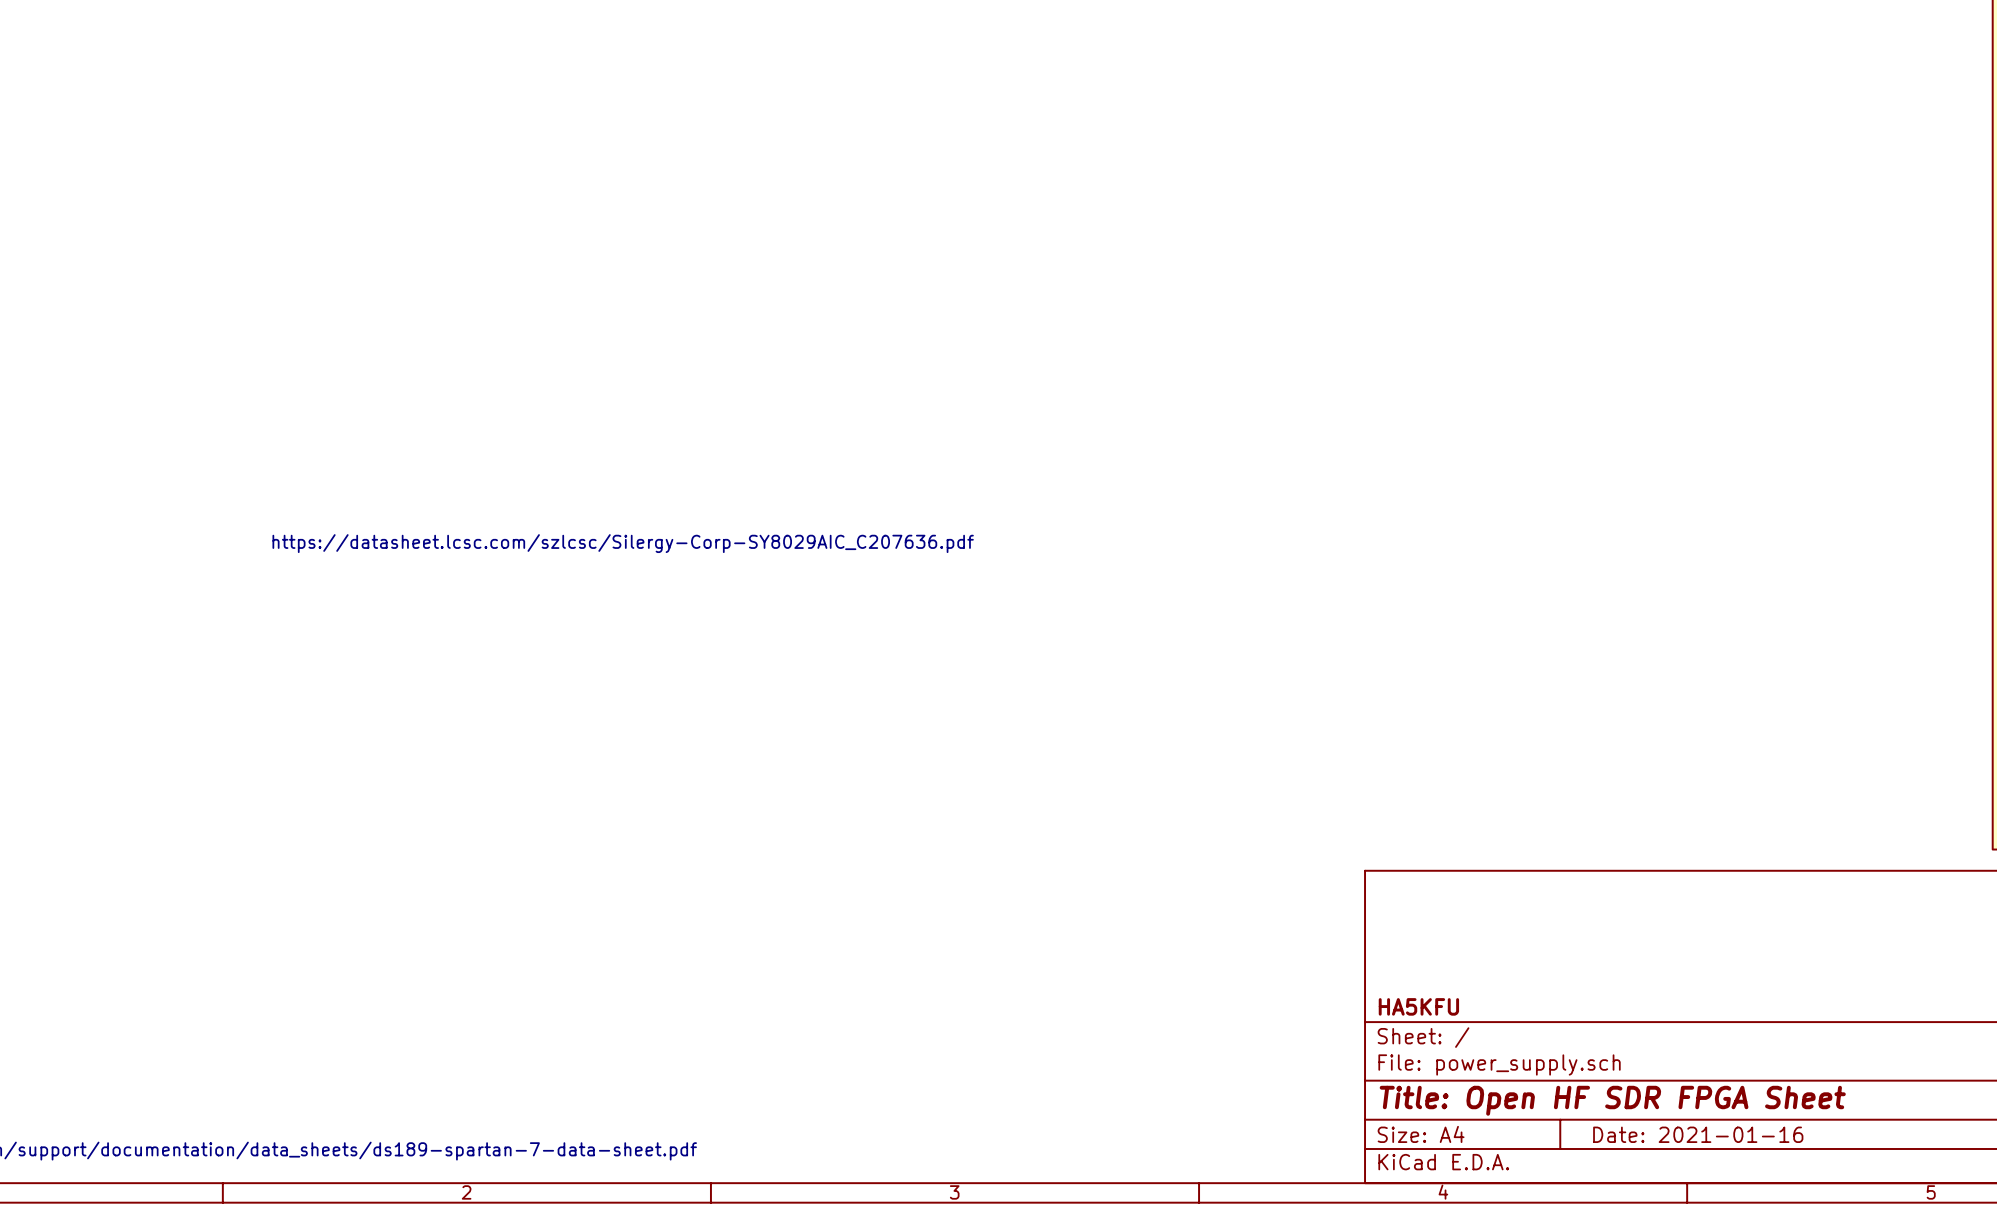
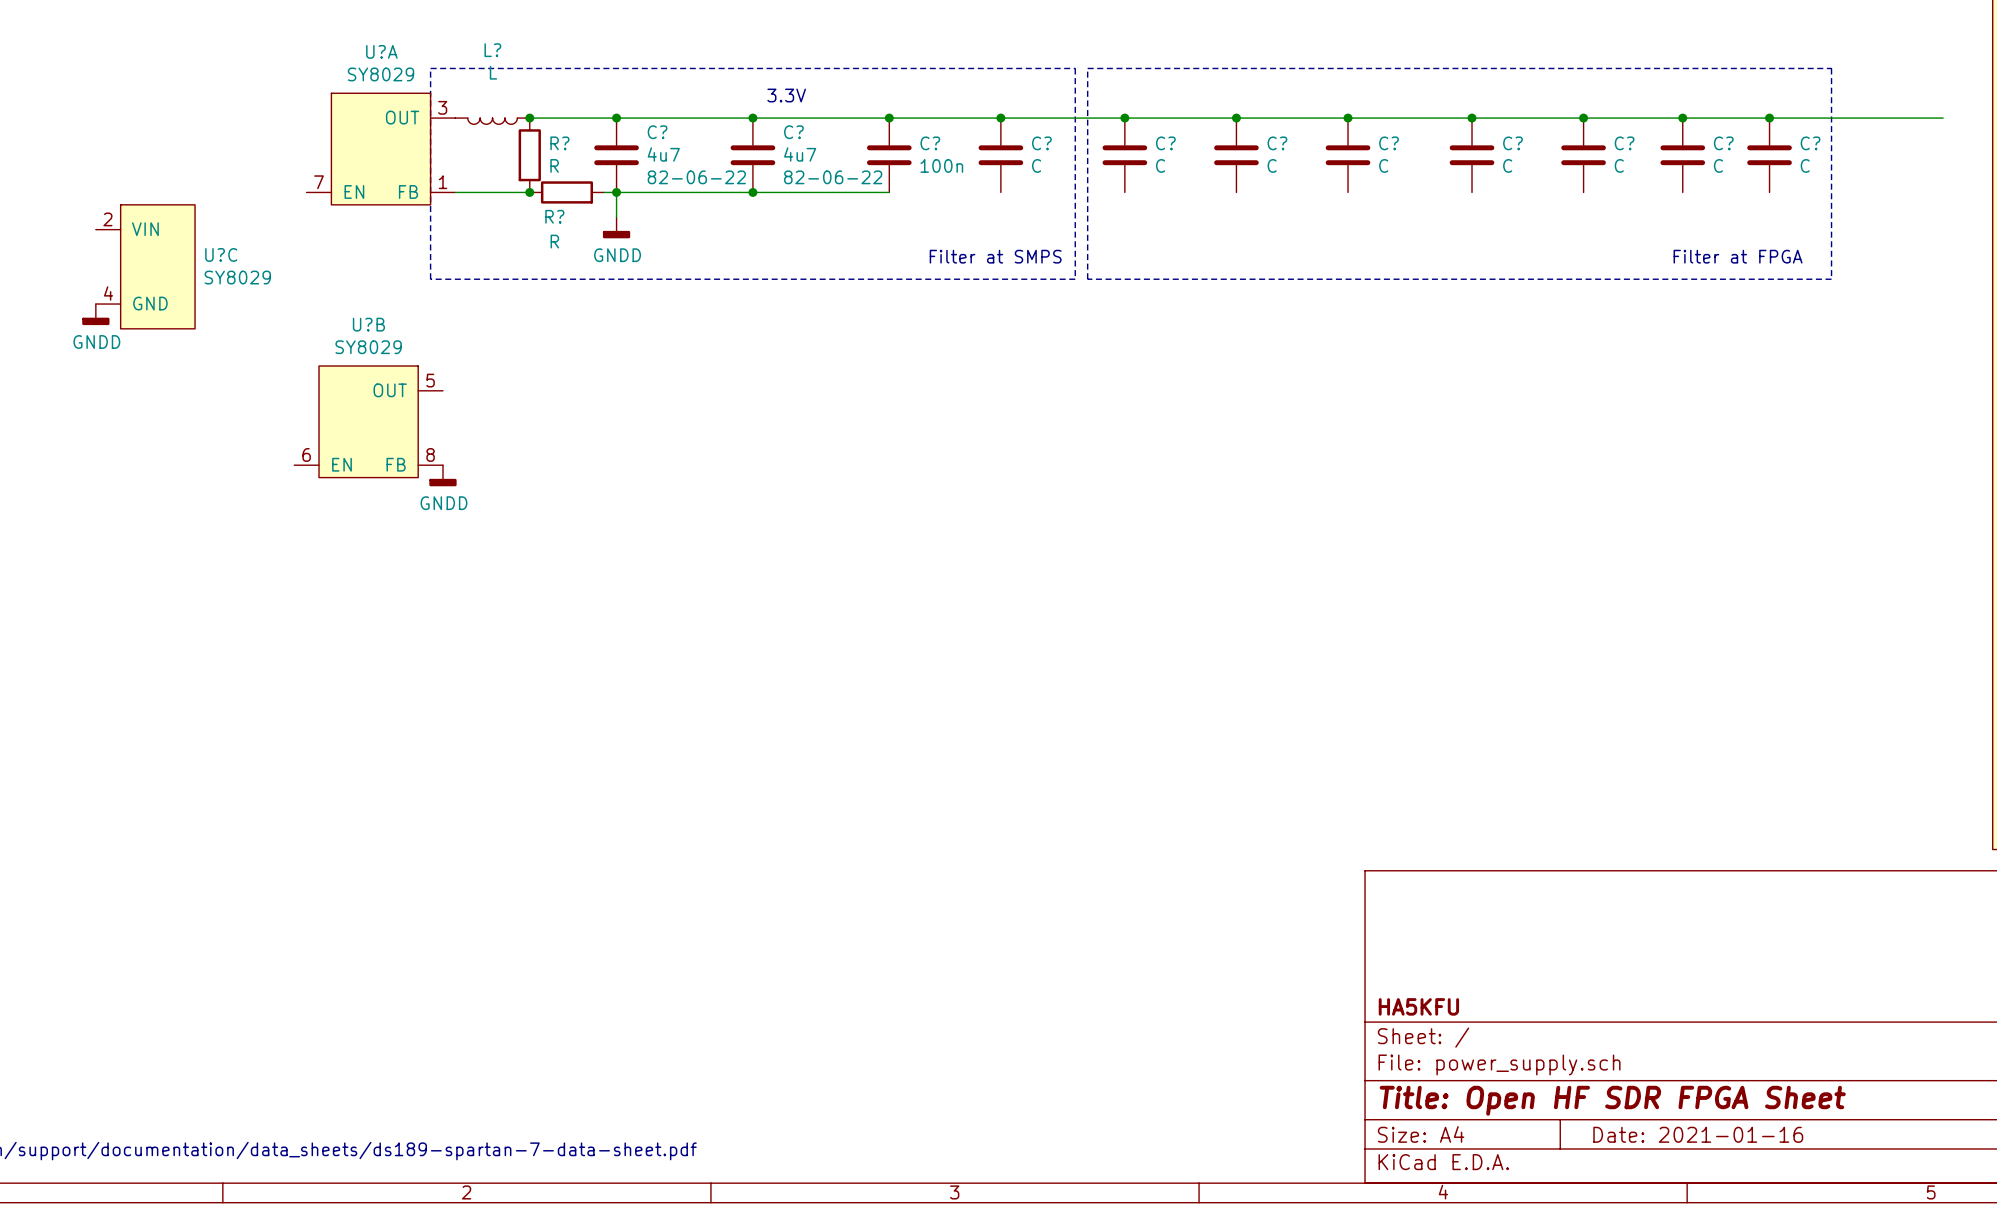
line: none -> (430, 68) (430, 279) (1075, 279) (1075, 68) (430, 68)
line: none -> (1087, 68) (1831, 68) (1831, 279) (1087, 279) (1087, 68)
text: none -> 3.3V (786, 95)
wire: none -> (529, 118) (1943, 118)
junction: none -> (529, 118)
junction: none -> (616, 118)
junction: none -> (752, 118)
junction: none -> (889, 118)
junction: none -> (1000, 118)
junction: none -> (1124, 118)
junction: none -> (1236, 118)
junction: none -> (1348, 118)
junction: none -> (1472, 118)
junction: none -> (1583, 118)
junction: none -> (1682, 118)
junction: none -> (1769, 118)
L?: none -> L (492, 121)
U?A: none -> SY8029 (381, 149)
R?: none -> R (529, 155)
C?: none -> 4u7 (616, 155)
C?: none -> 4u7 (752, 155)
C?: none -> 100n (889, 155)
C?: none -> C (1000, 155)
C?: none -> C (1124, 155)
C?: none -> C (1236, 155)
C?: none -> C (1348, 155)
C?: none -> C (1472, 155)
C?: none -> C (1583, 155)
C?: none -> C (1682, 155)
C?: none -> C (1769, 155)
wire: none -> (455, 192) (529, 192)
junction: none -> (529, 192)
R?: none -> R (566, 192)
wire: none -> (604, 192) (889, 192)
wire: none -> (616, 192) (616, 217)
junction: none -> (616, 192)
junction: none -> (752, 192)
power symbol: none -> GNDD (616, 227)
text: none -> Filter at SMPS (995, 256)
text: none -> Filter at FPGA (1738, 256)
U?C: none -> SY8029 (145, 266)
power symbol: none -> GNDD (95, 314)
U?B: none -> SY8029 (368, 421)
power symbol: none -> GNDD (442, 475)
text: https://datasheet.lcsc.com/szlcsc/Silergy-Corp-SY8029AIC_C207636.pdf (623, 543) -> none

